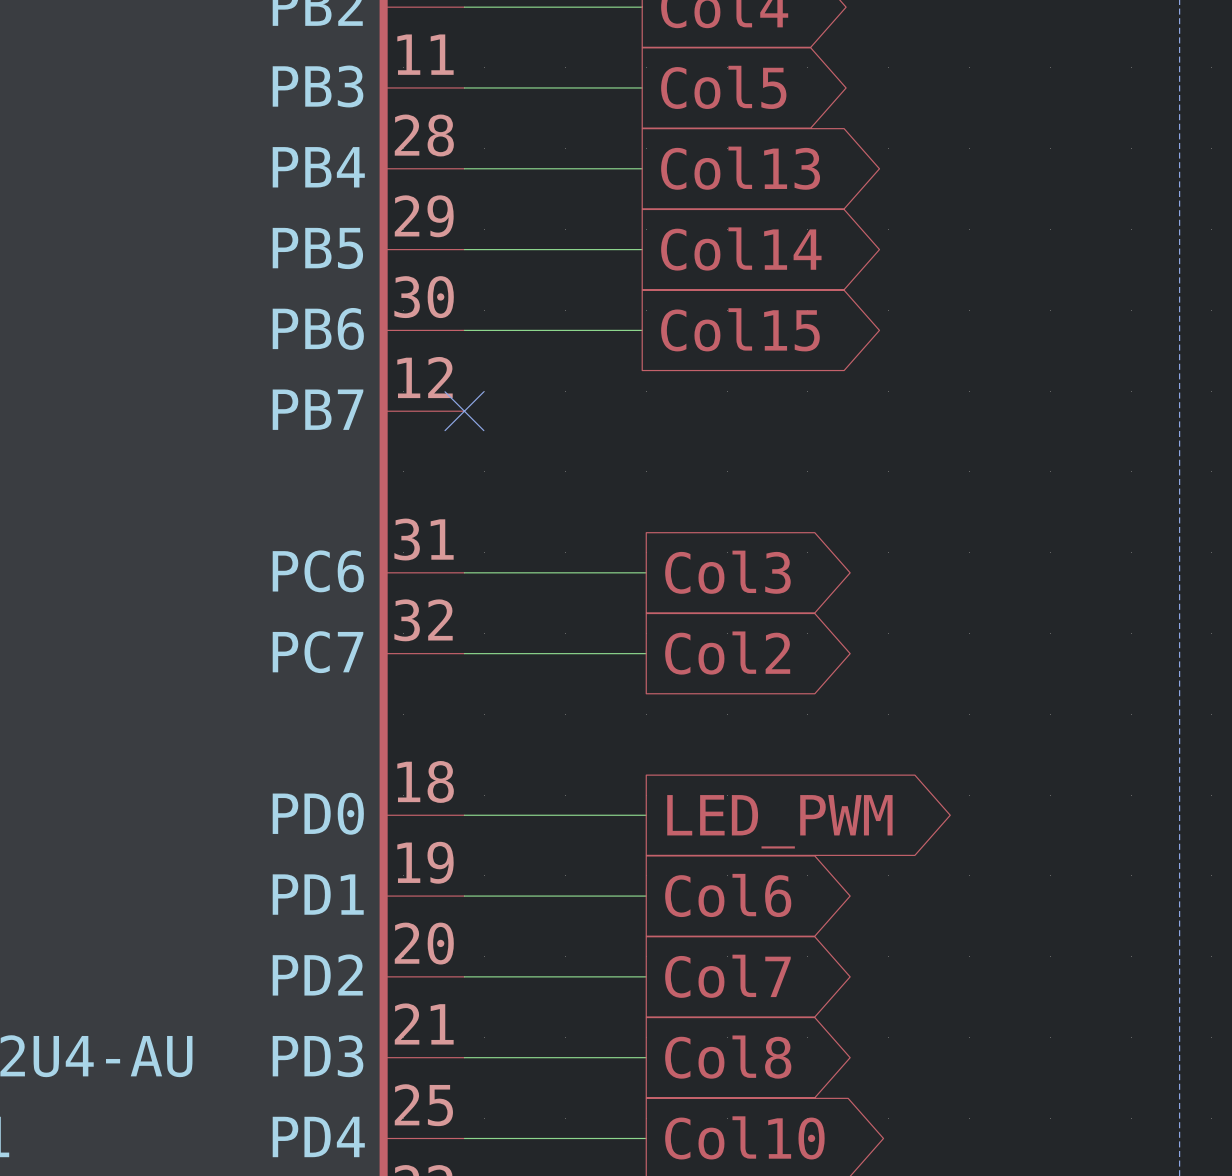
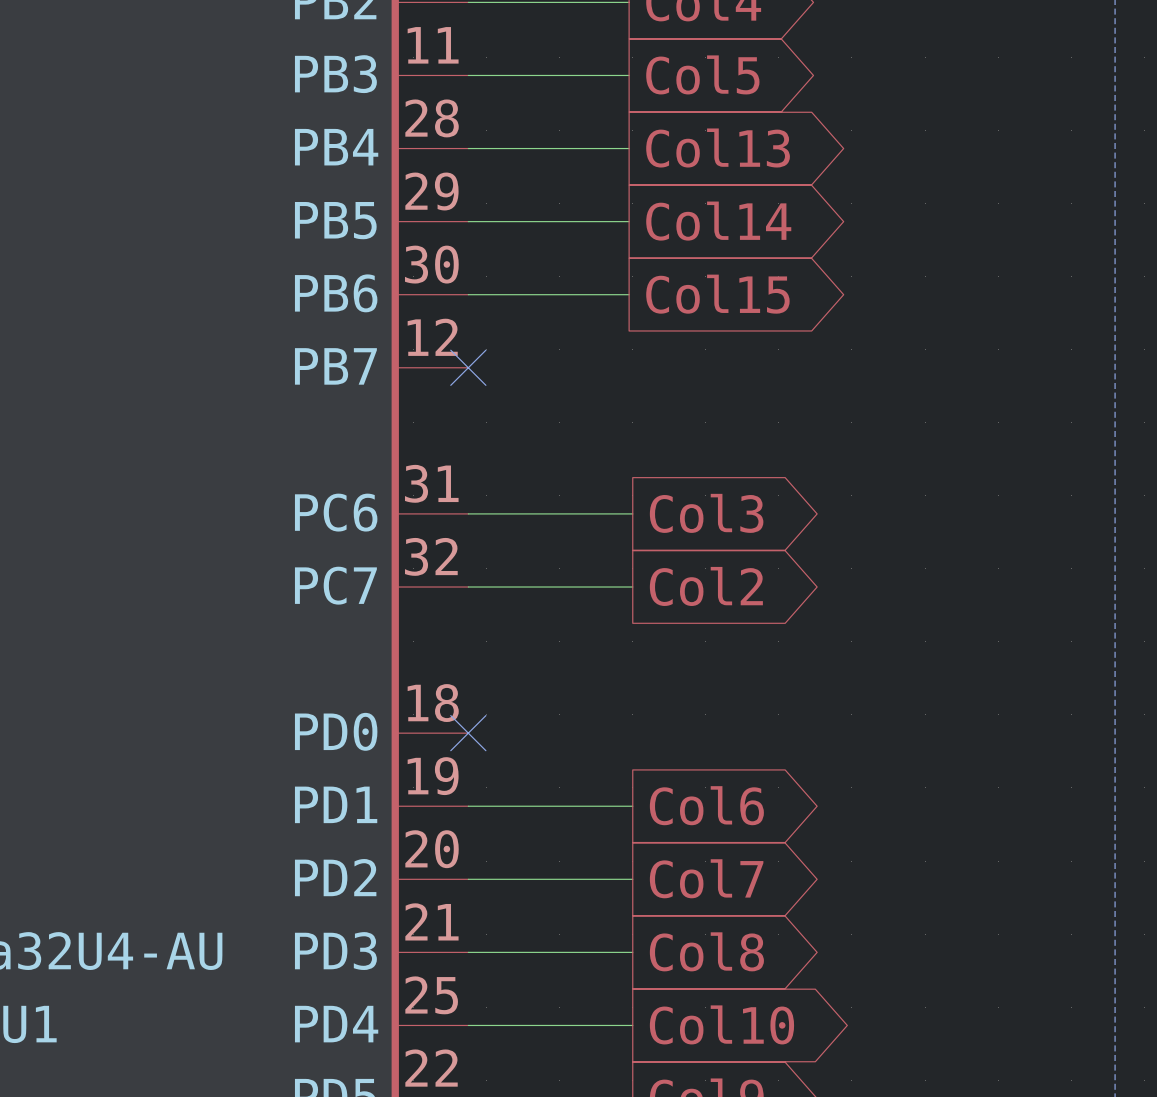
wire: (464, 815) (646, 815) -> none
no-connect mark: none -> (468, 733)
global label: LED_PWM (779, 821) -> none

